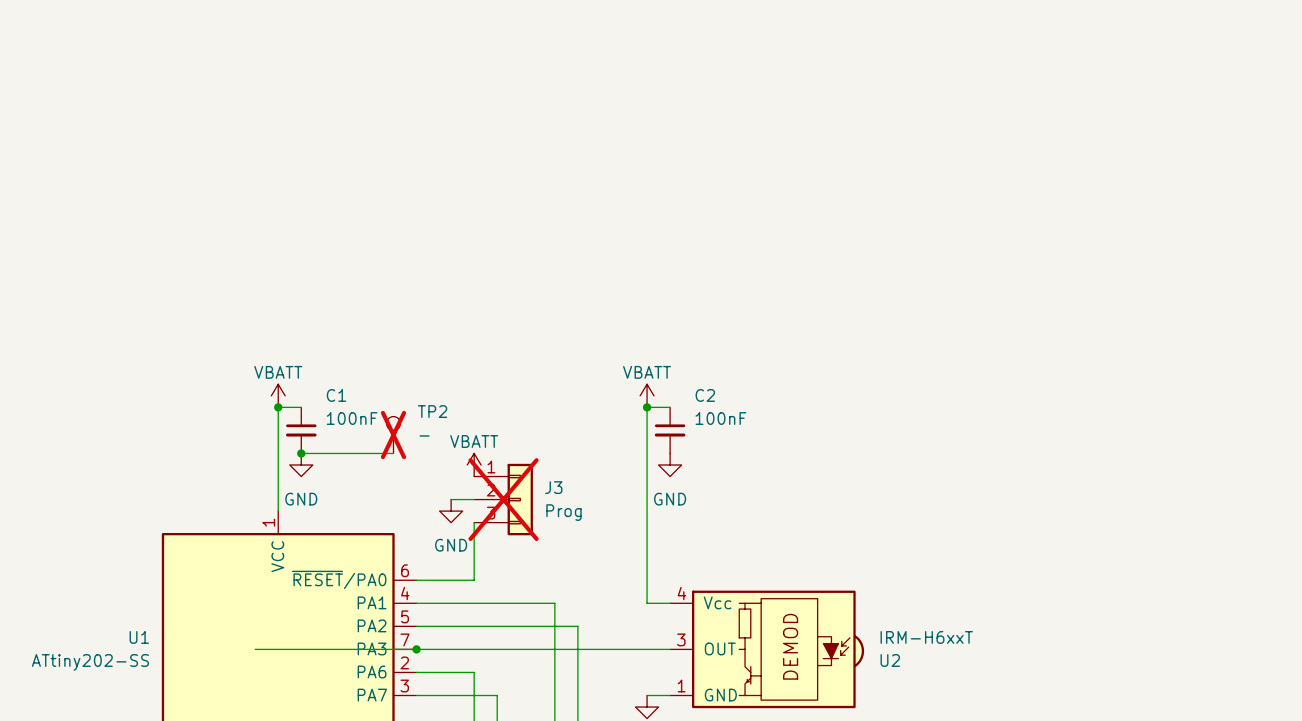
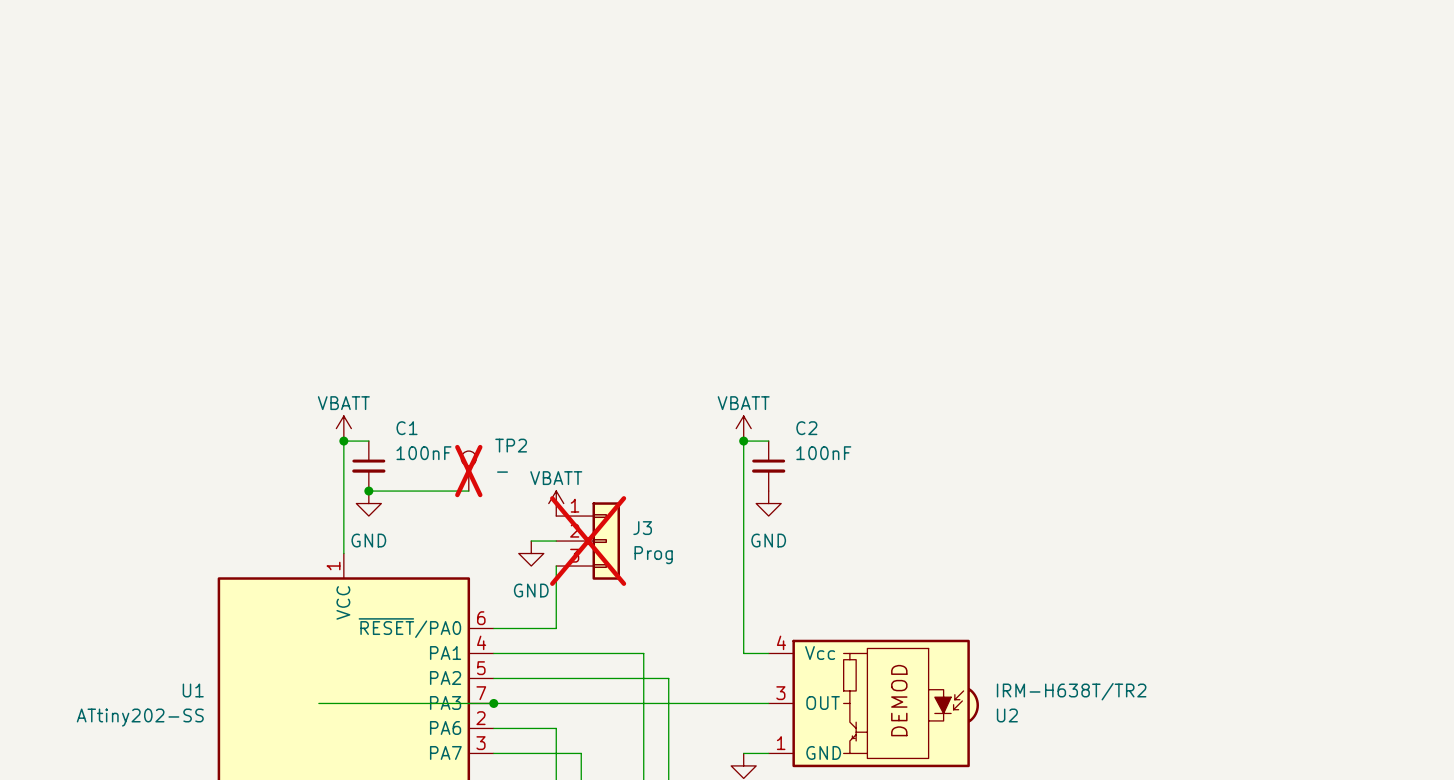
U2 value: IRM-H6xxT (926, 637) -> IRM-H638T/TR2 (1071, 691)

